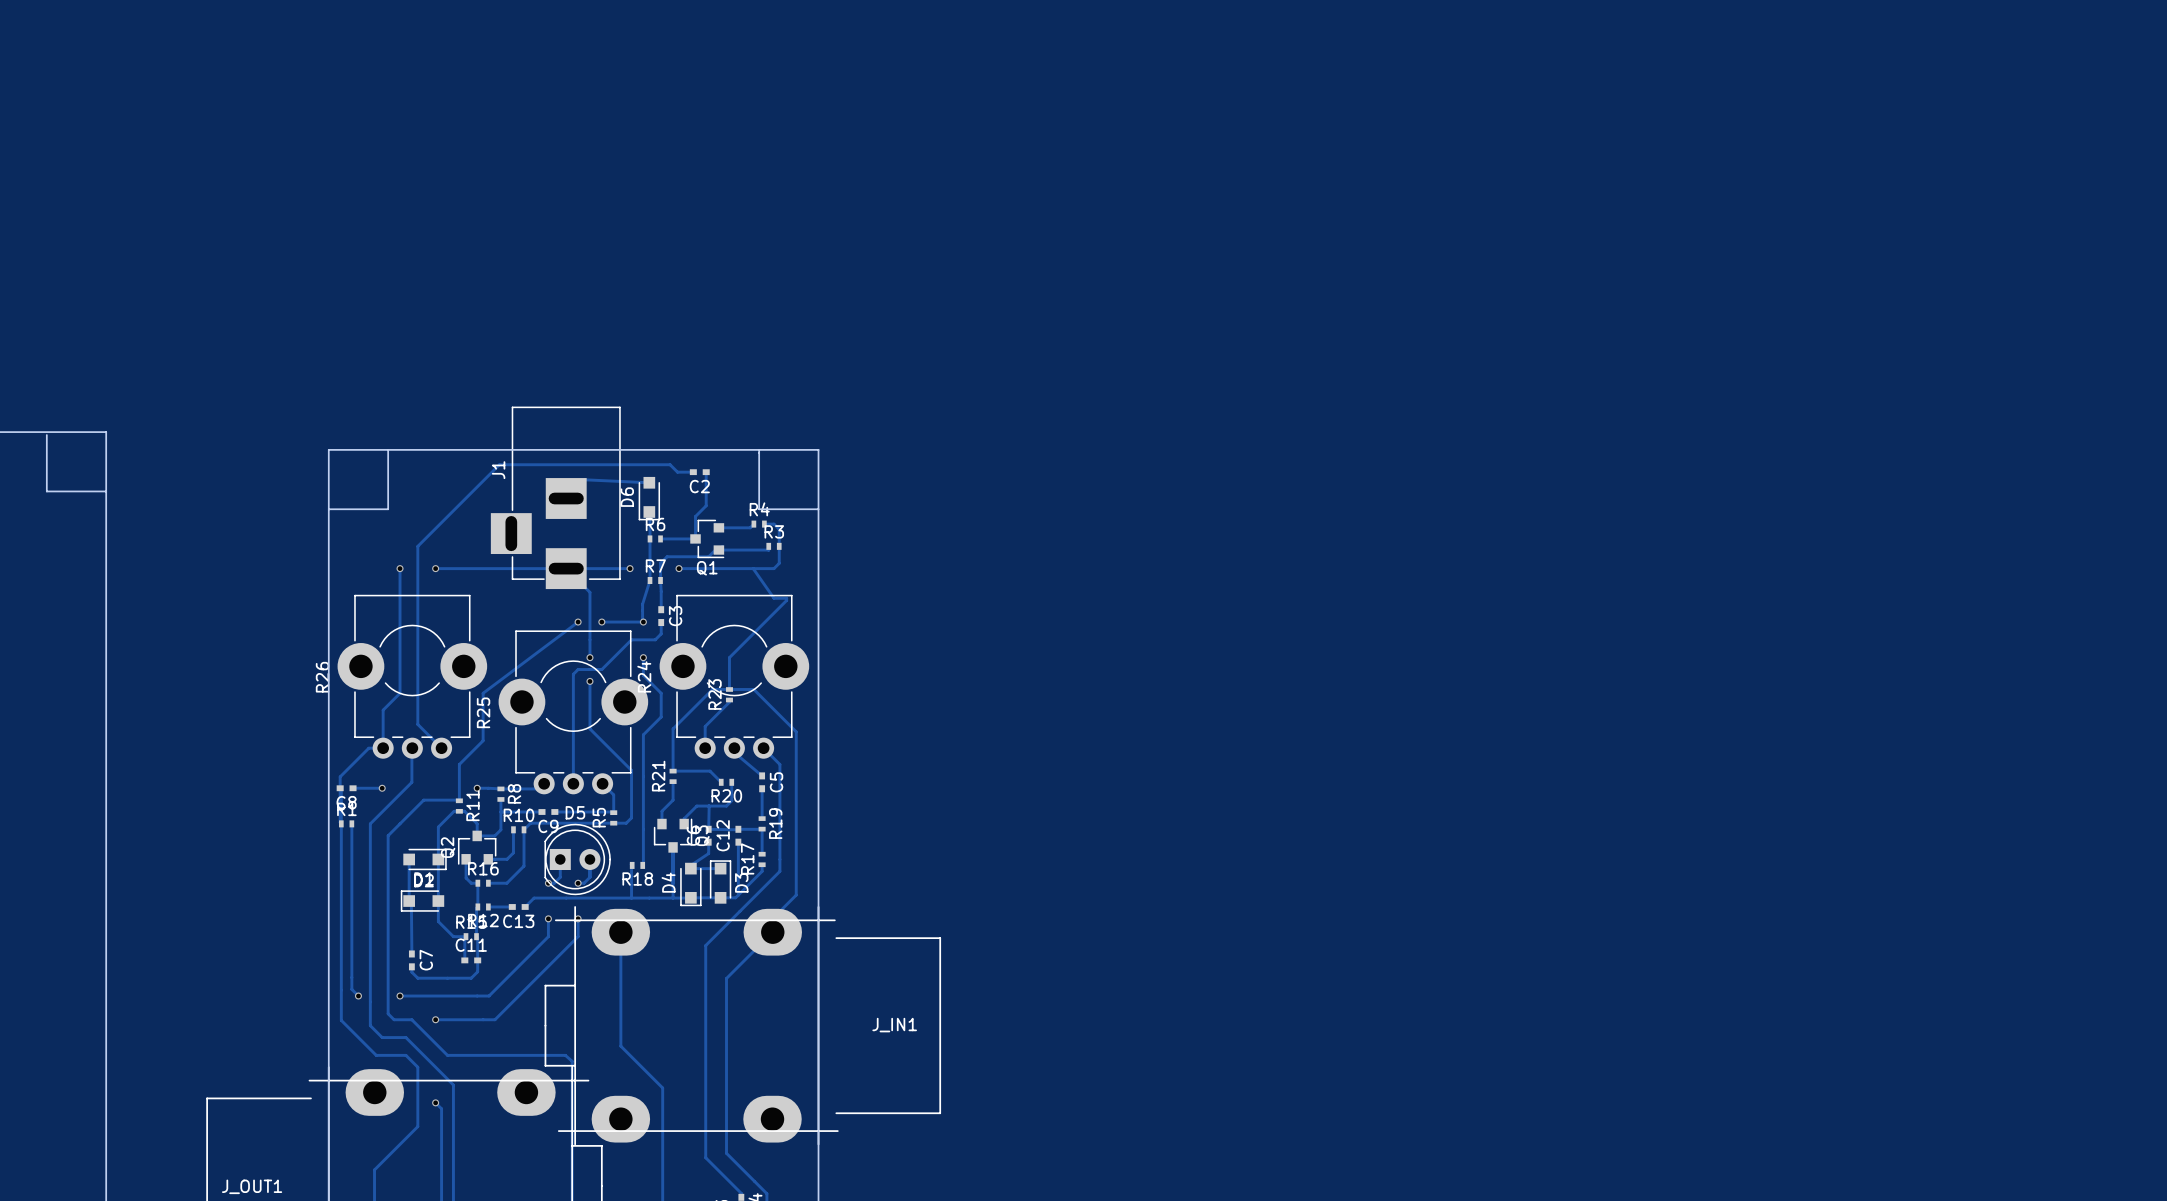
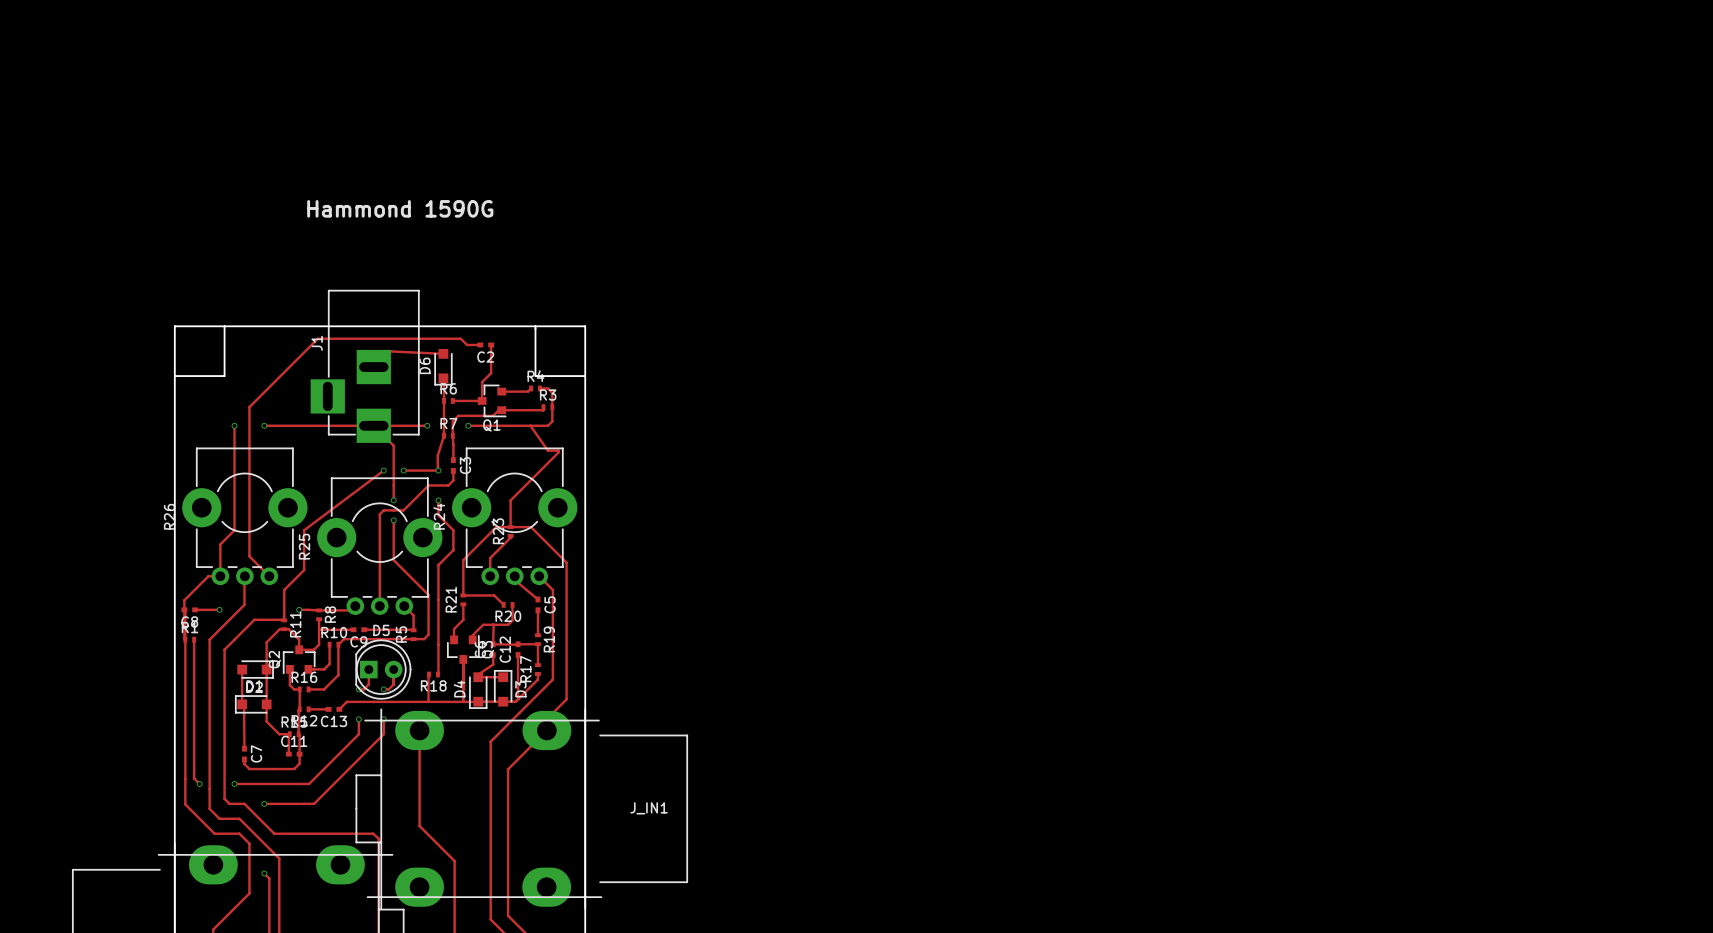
text: none -> Hammond 1590G (400, 208)

